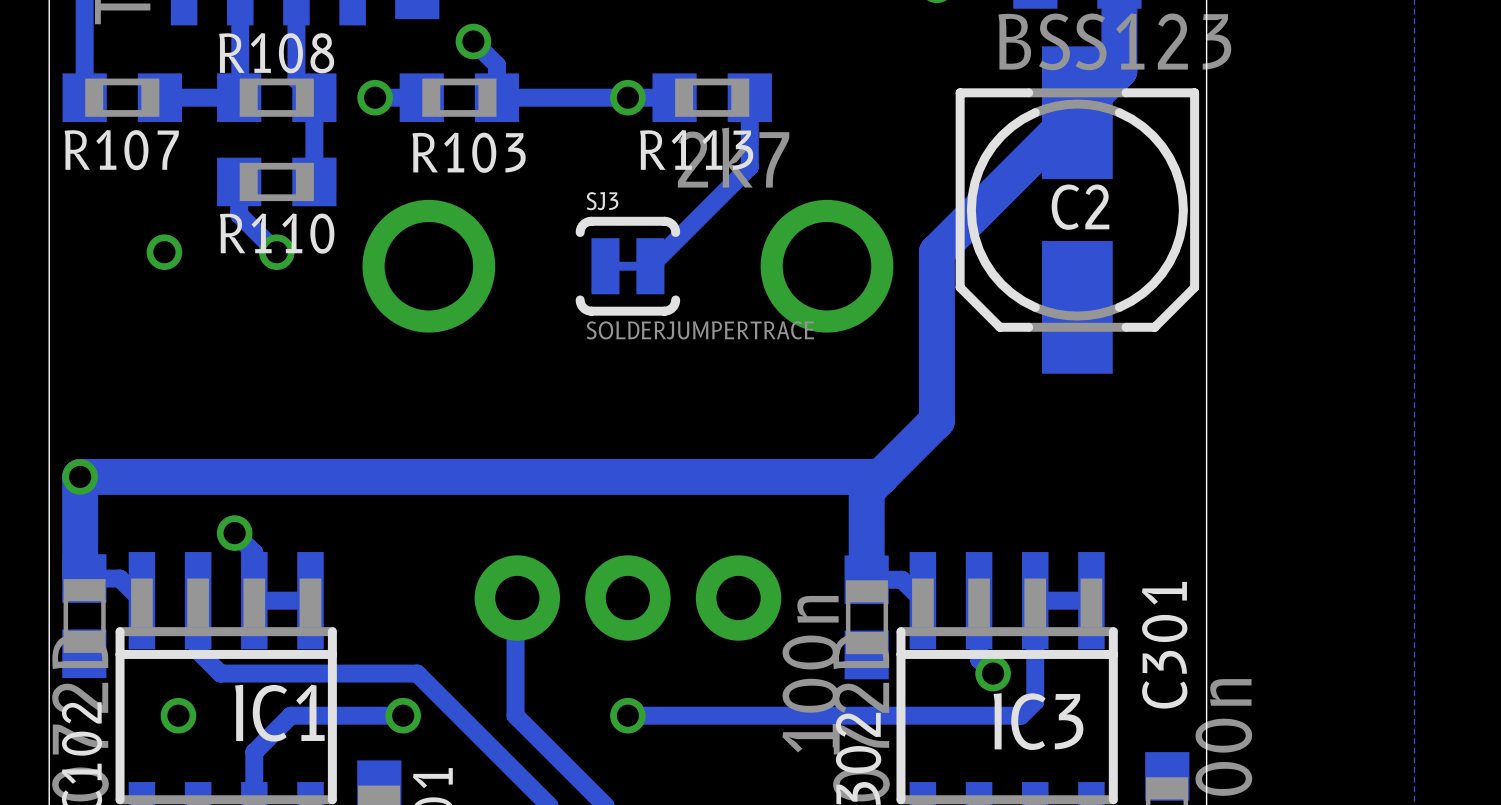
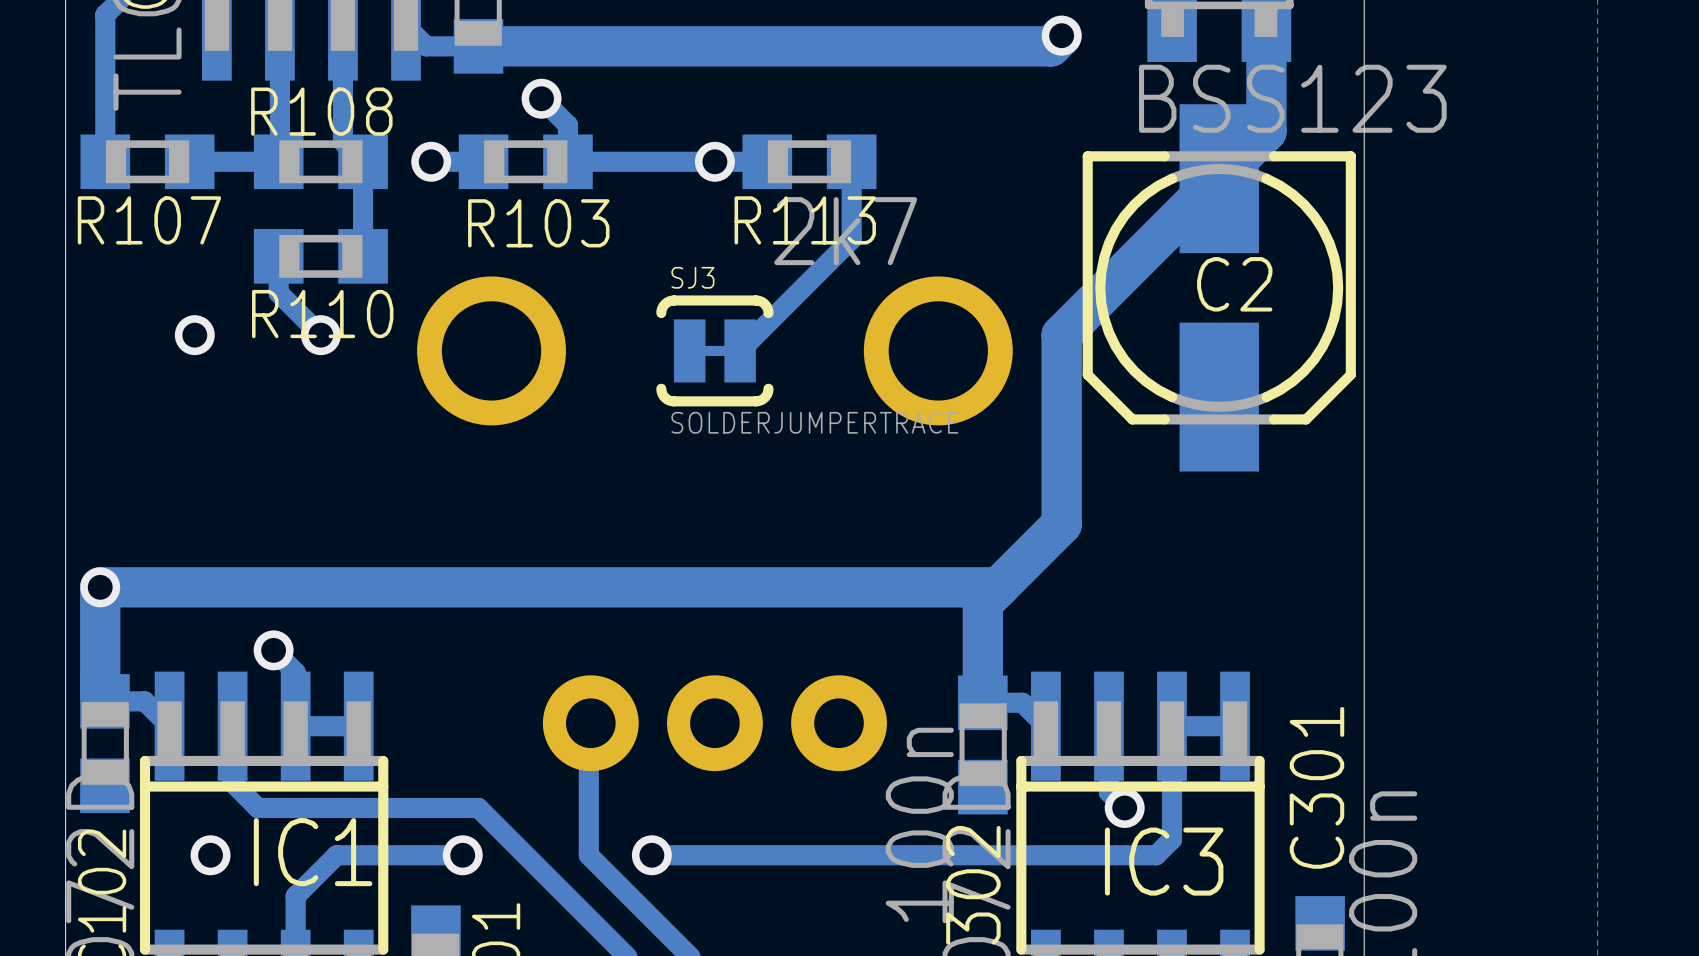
track: none -> (714, 855) (651, 855)
via position: (627, 715) -> (651, 855)

